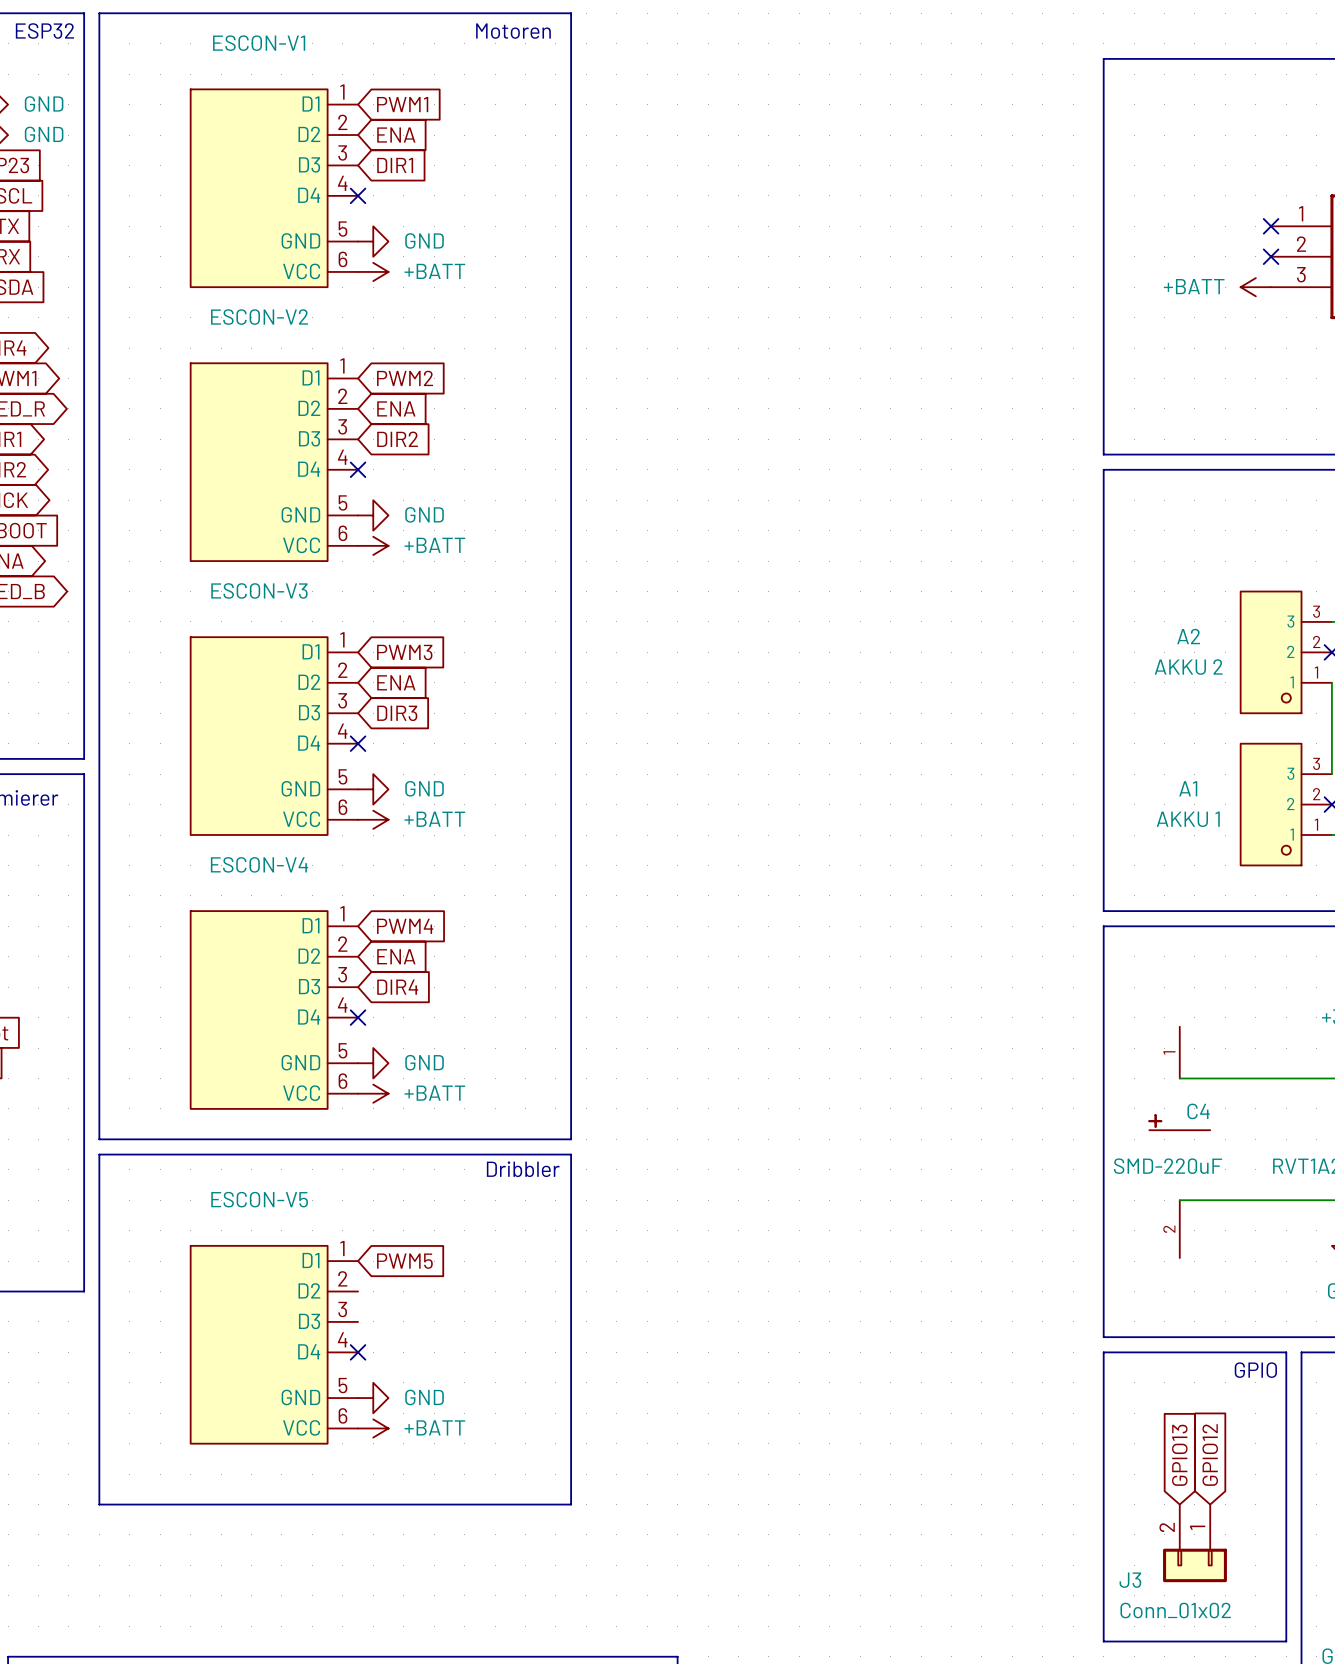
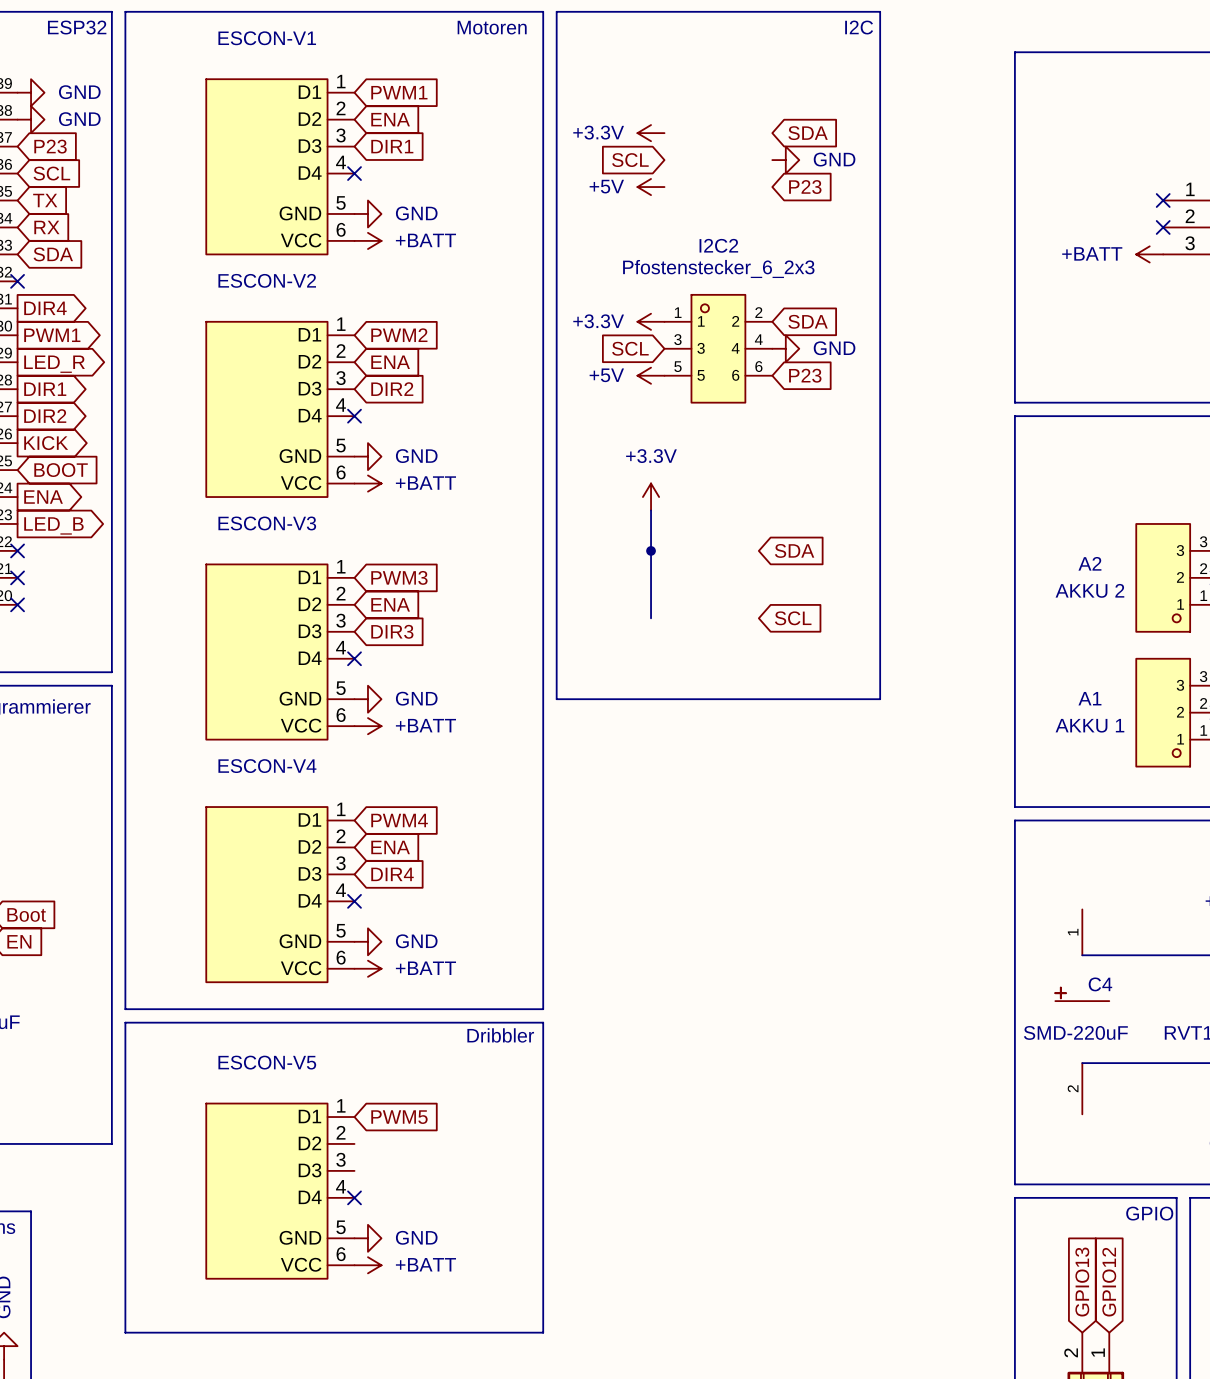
line: none -> (556, 11) (880, 11) (880, 699) (556, 699) (556, 11)
text: none -> I2C (859, 27)
power symbol: none -> +3.3V (651, 133)
global label: none -> SDA (808, 133)
global label: none -> SCL (630, 160)
power symbol: none -> GND (785, 160)
power symbol: none -> +5V (651, 187)
global label: none -> P23 (805, 187)
power symbol: none -> +3.3V (651, 321)
global label: none -> SDA (808, 321)
global label: none -> SCL (630, 348)
I2C2: none -> Pfostenstecker_6_2x3 (718, 348)
power symbol: none -> GND (785, 348)
power symbol: none -> +5V (651, 375)
global label: none -> P23 (805, 375)
power symbol: none -> +3.3V (651, 497)
wire: none -> (651, 510) (651, 618)
junction: none -> (651, 550)
global label: none -> SDA (794, 550)
global label: none -> SCL (793, 618)

